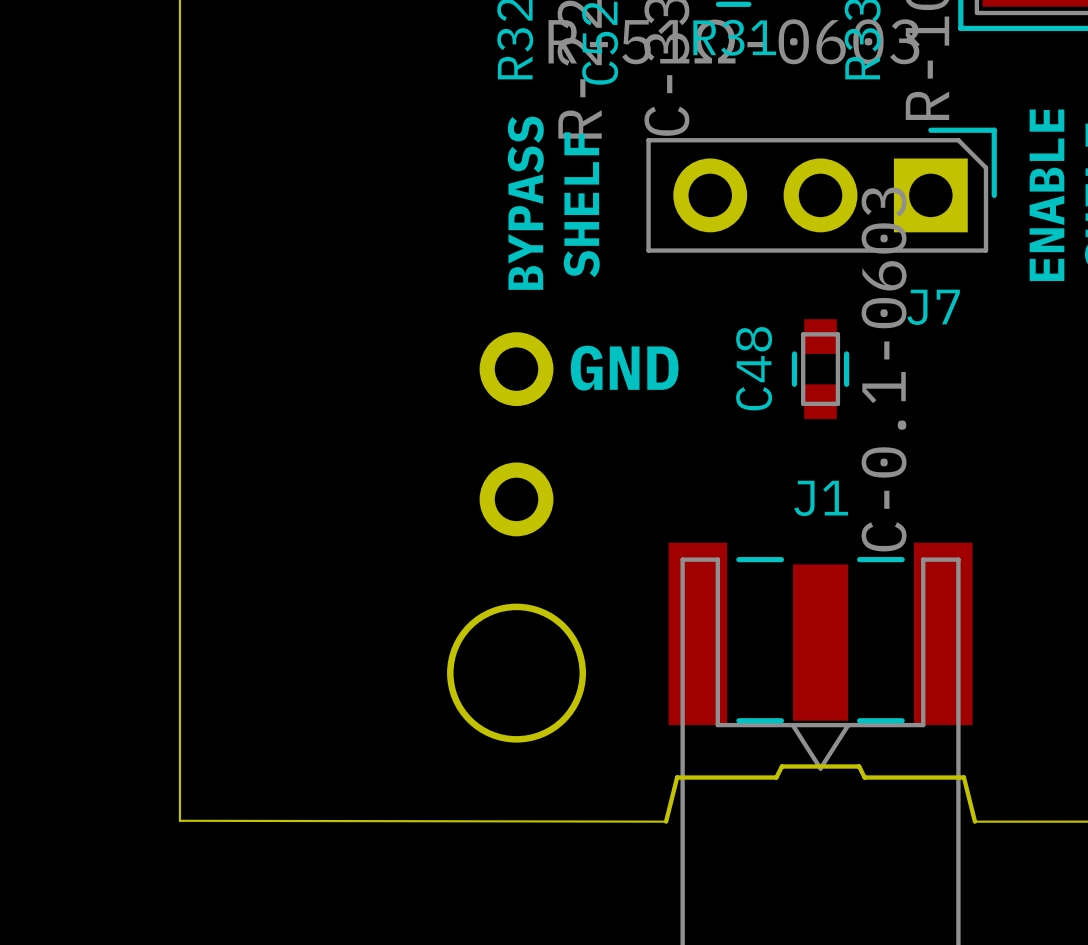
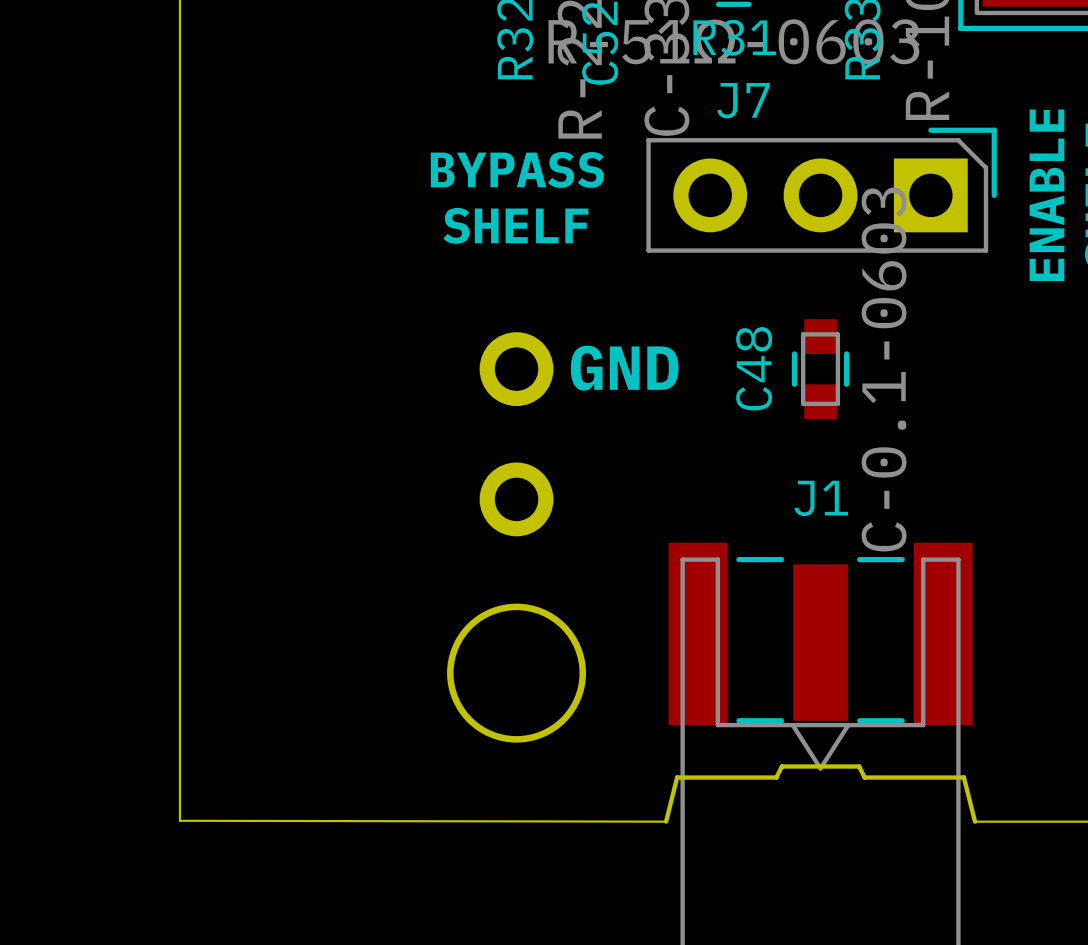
text rotation: 0° (525, 203) -> 90° clockwise (517, 169)
text rotation: 0° (581, 204) -> 90° clockwise (515, 225)
J7 name position: J7 (933, 307) -> J7 (743, 100)

